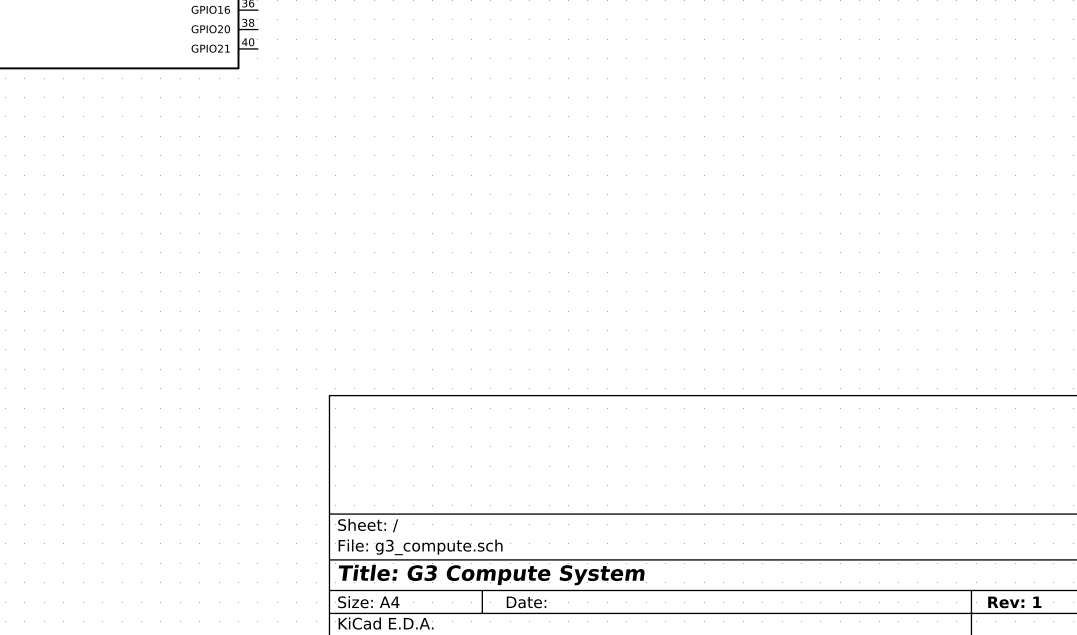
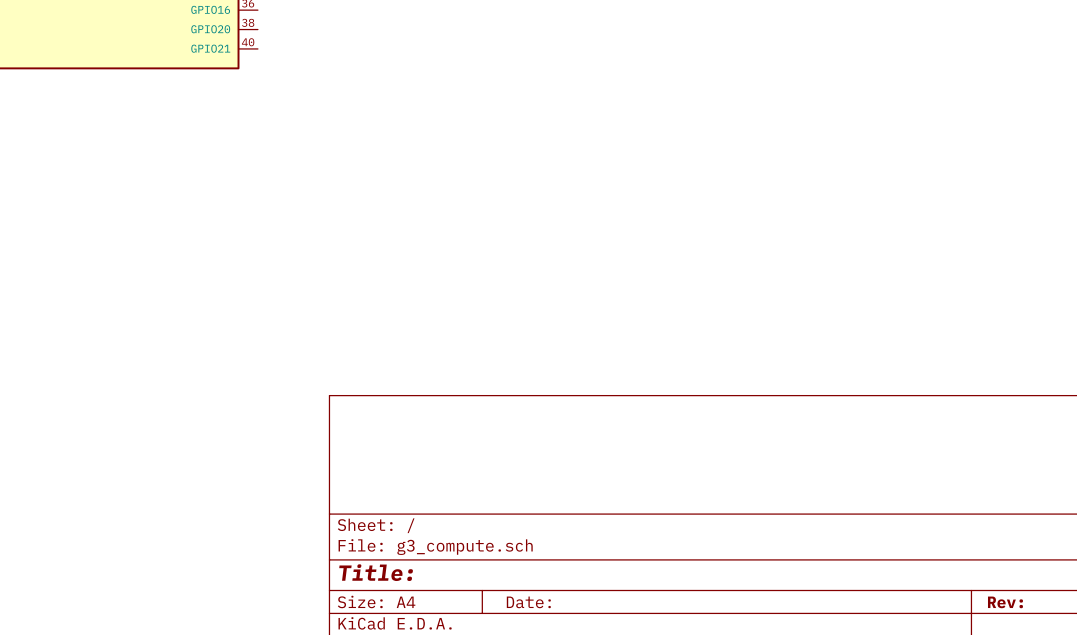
title block: Title: G3 Compute System (491, 575) -> Title: (376, 572)
title block: Rev: 1 (1014, 602) -> Rev: (1005, 602)

